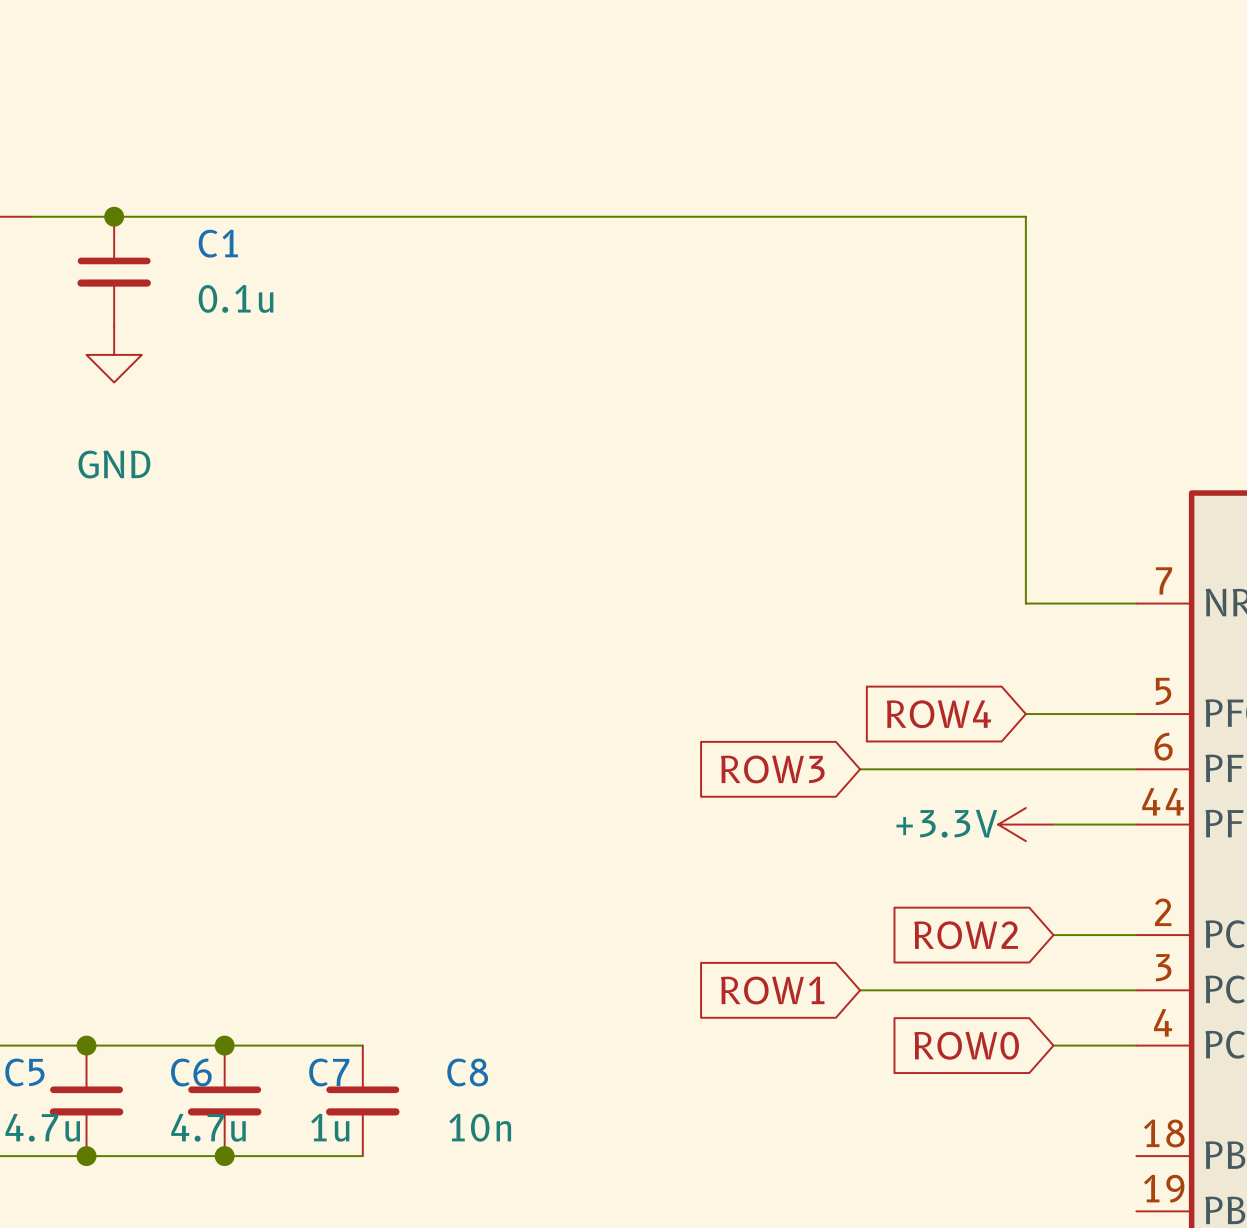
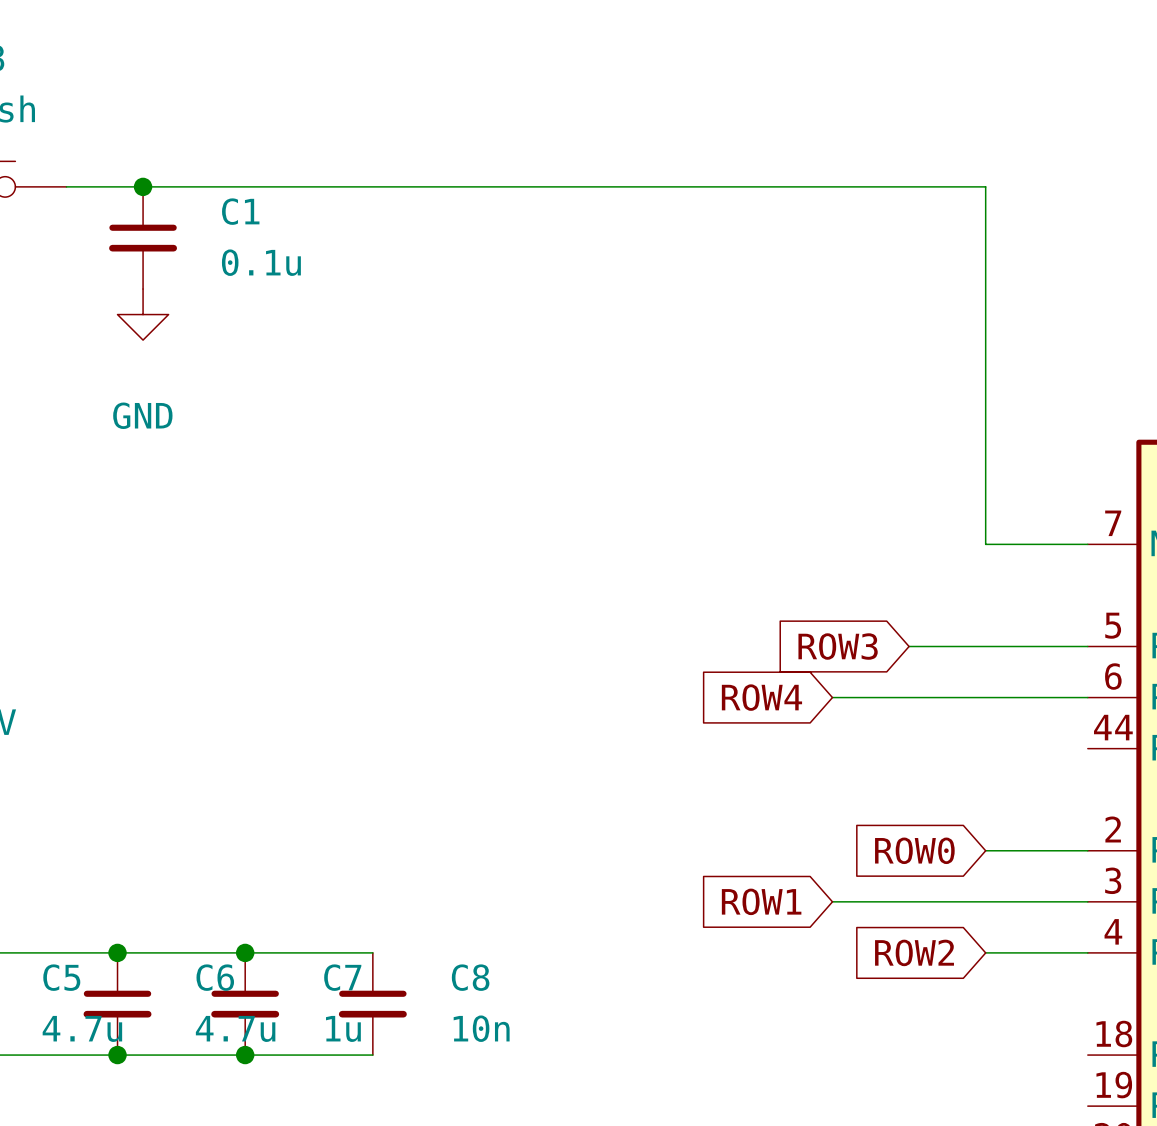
global label: ROW4 (938, 714) -> ROW3 (838, 646)
global label: ROW3 (772, 769) -> ROW4 (761, 697)
power symbol: +3.3V (1025, 824) -> none
wire: (1053, 824) (1136, 824) -> (909, 646) (985, 646)
global label position: ROW2 (966, 935) -> ROW2 (914, 952)
wire: none -> (985, 850) (1011, 850)
global label position: ROW0 (966, 1045) -> ROW0 (914, 850)
wire: none -> (985, 952) (1011, 952)

